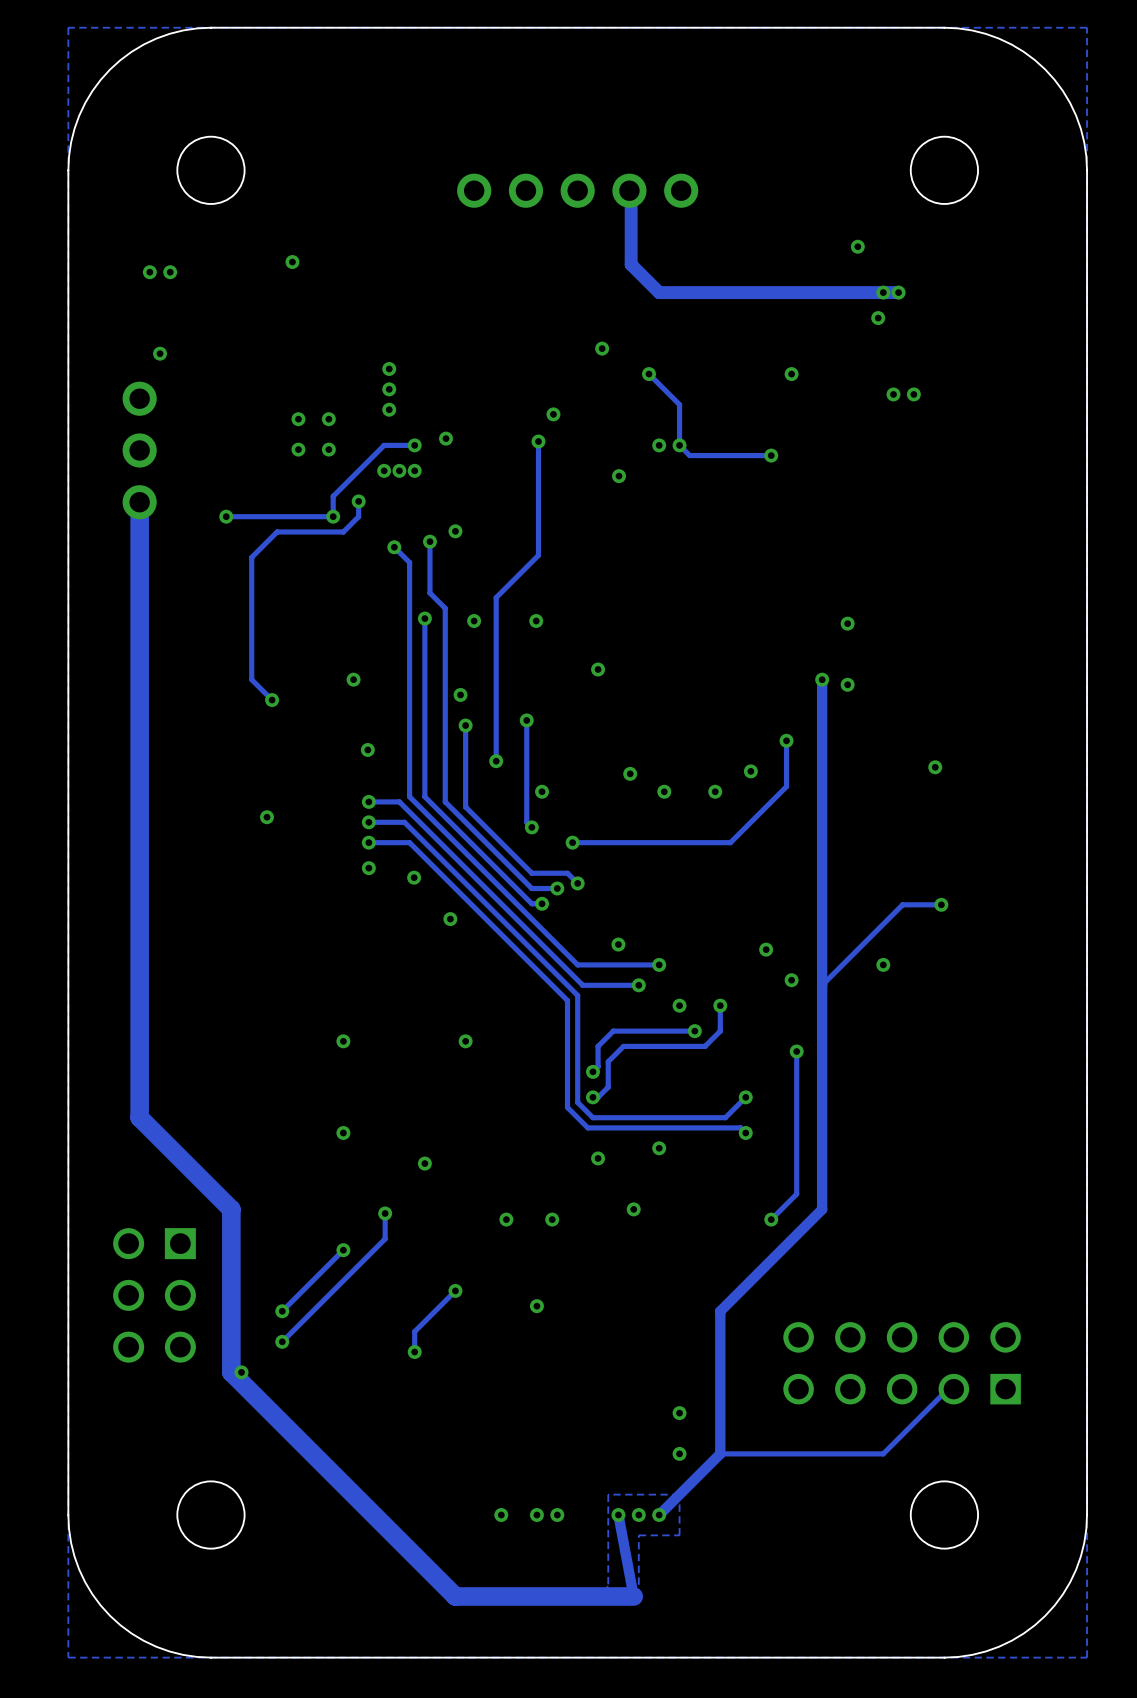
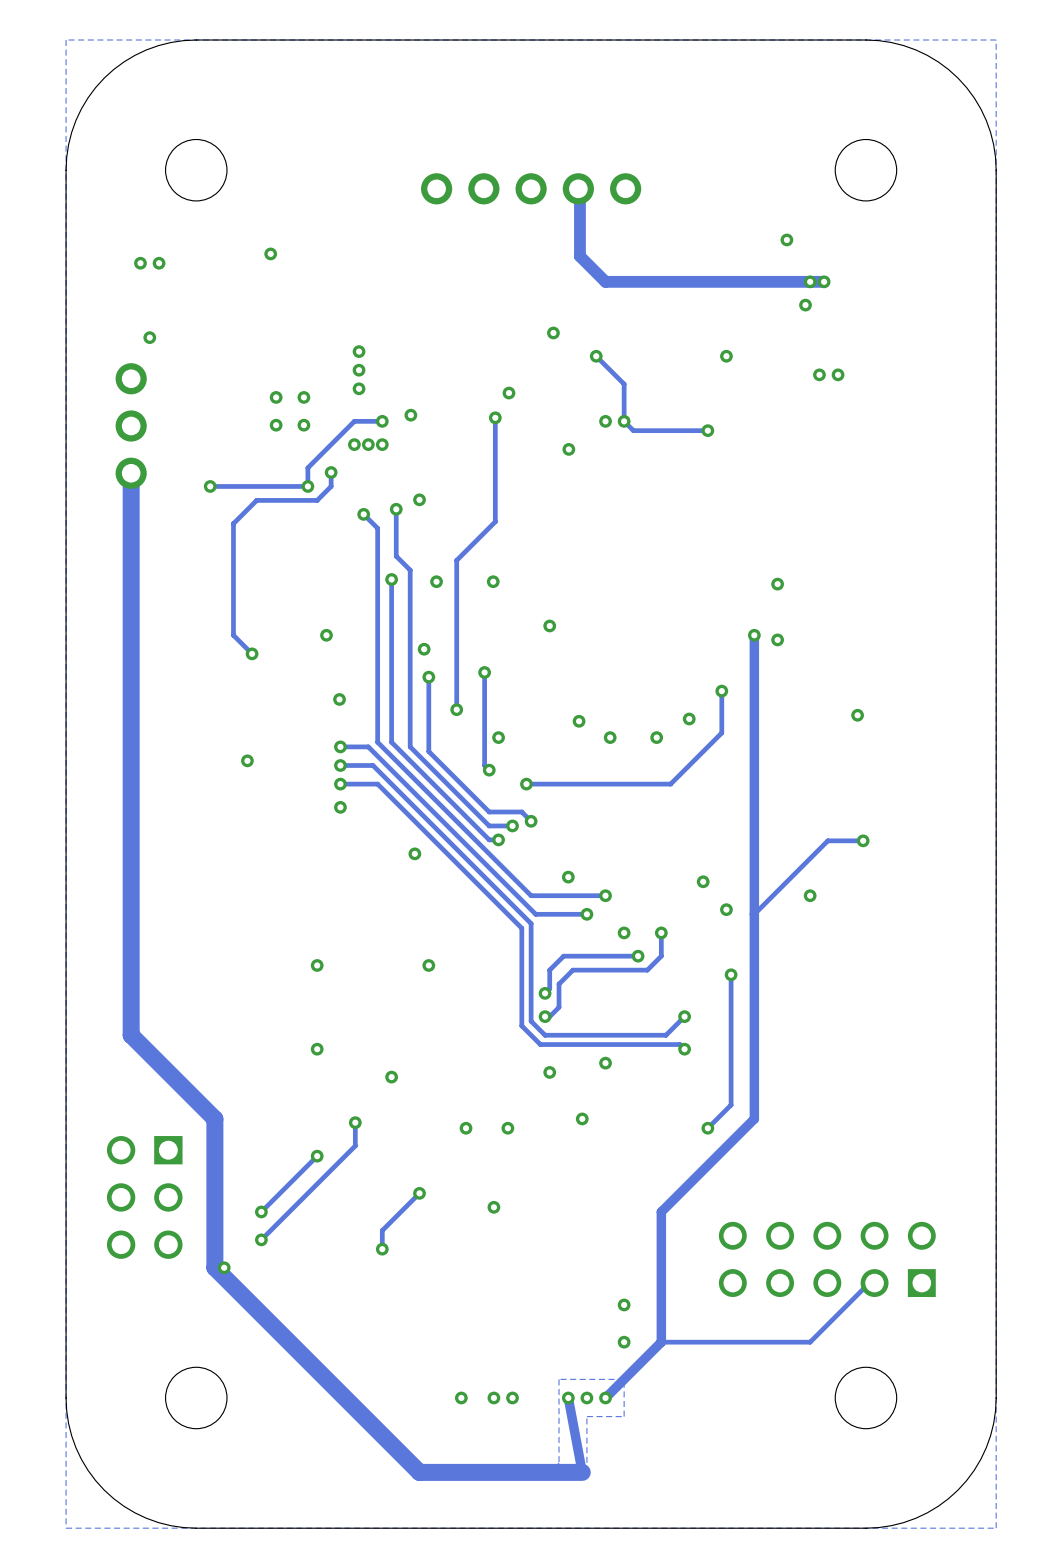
via: (414, 877) -> none

